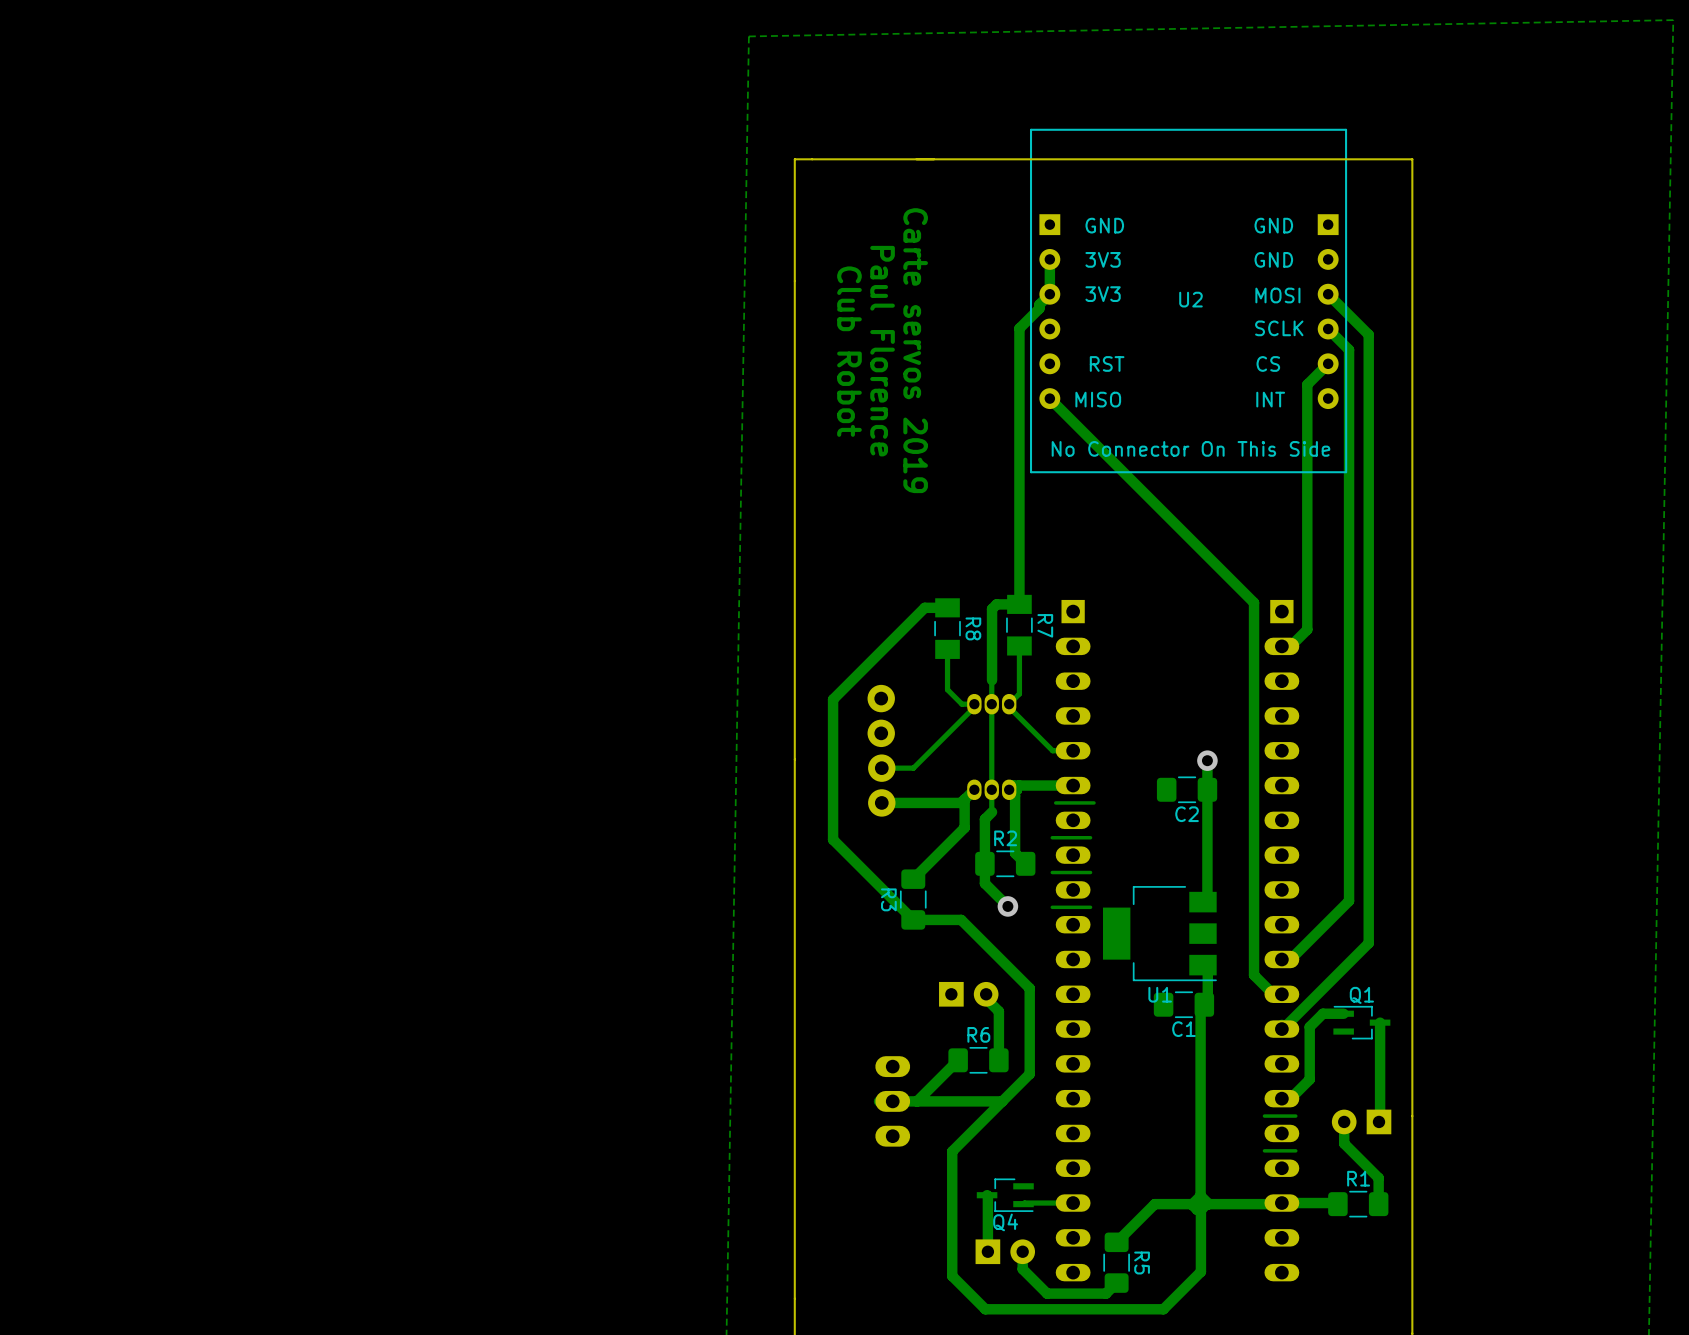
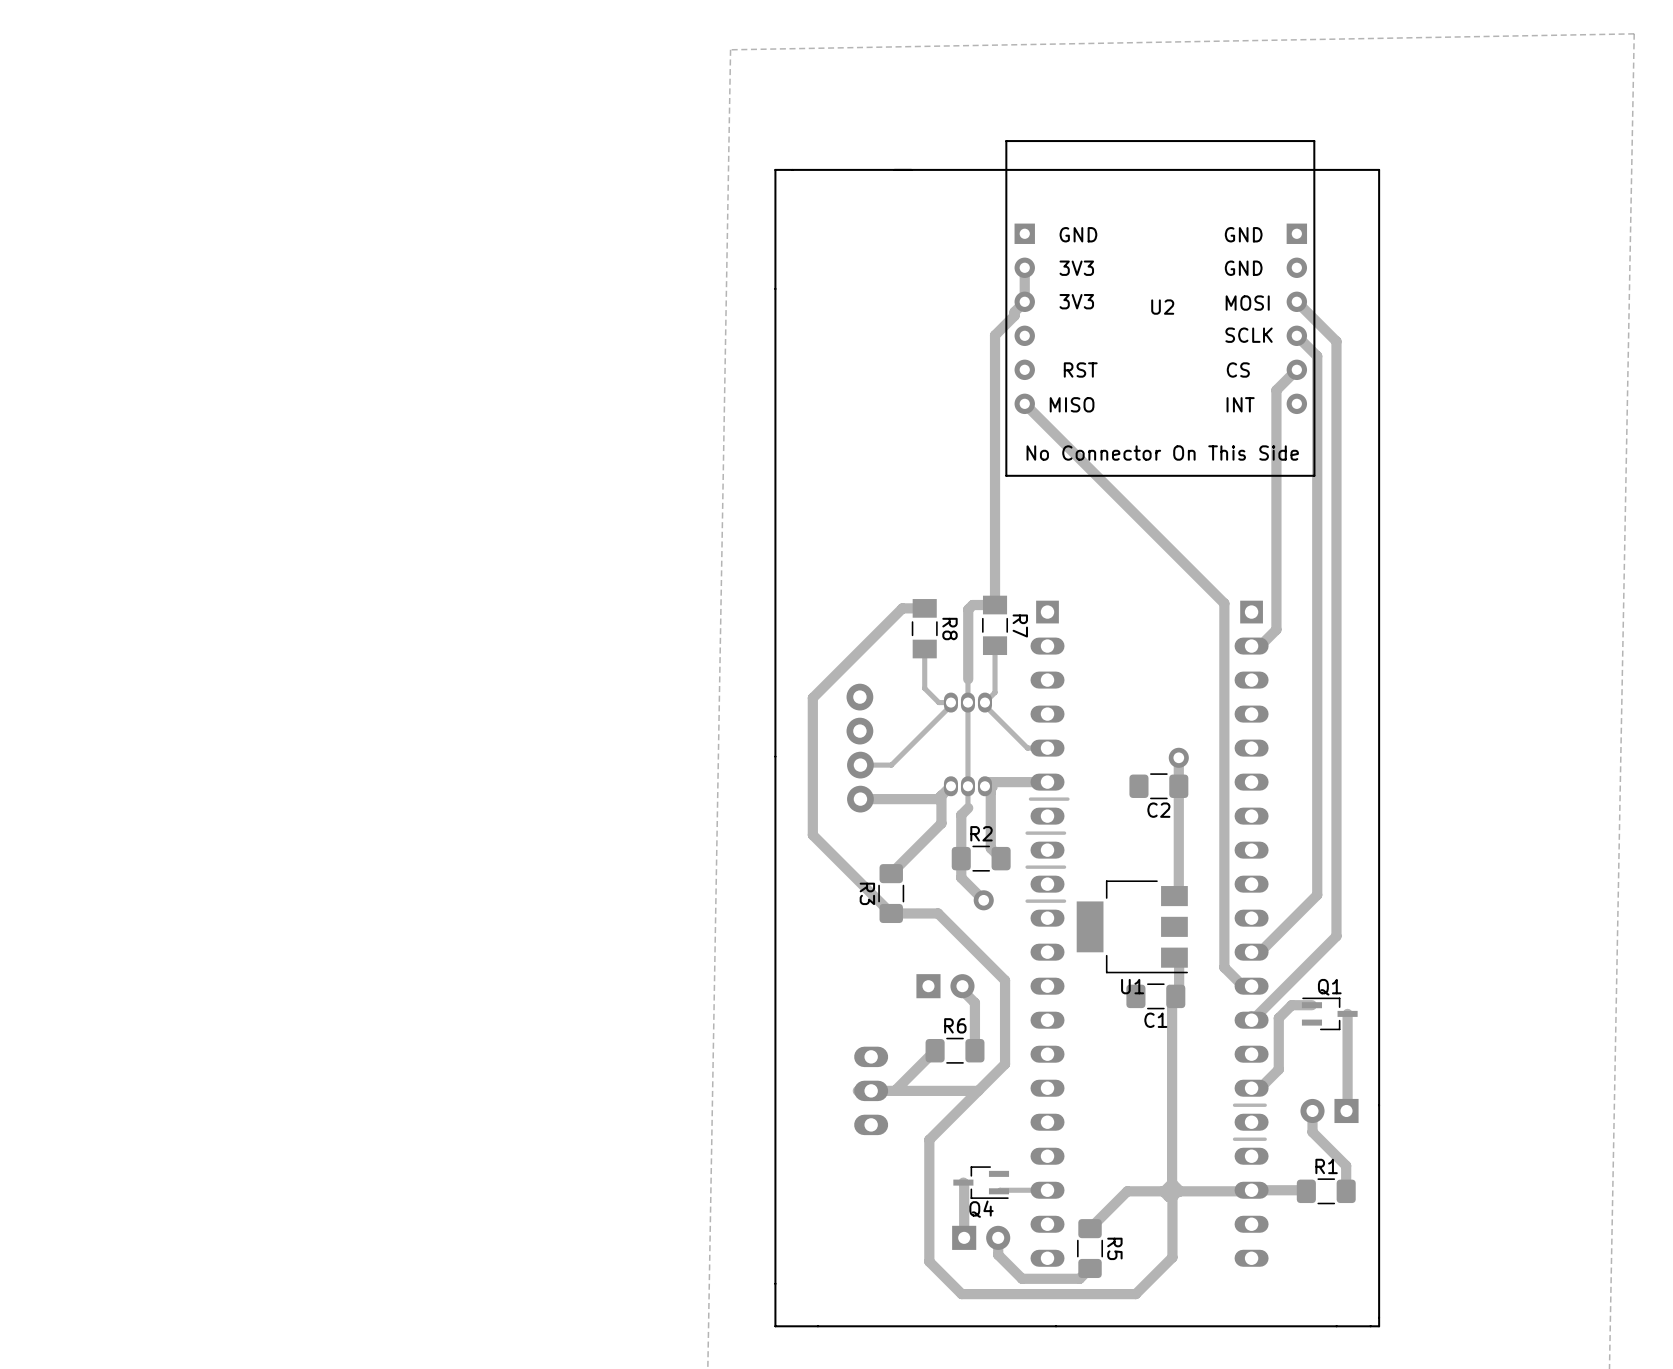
text: Carte servos 2019 (915, 350) -> none
text: Club Robot (849, 351) -> none
text: Paul Florence (882, 351) -> none

